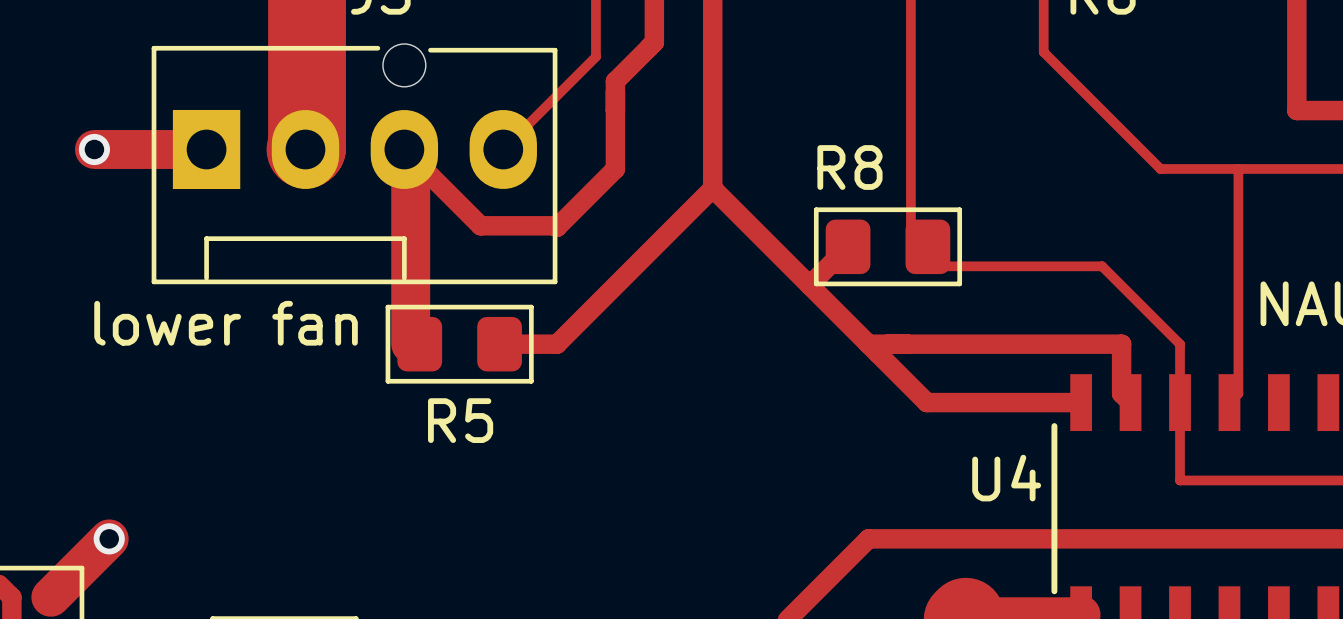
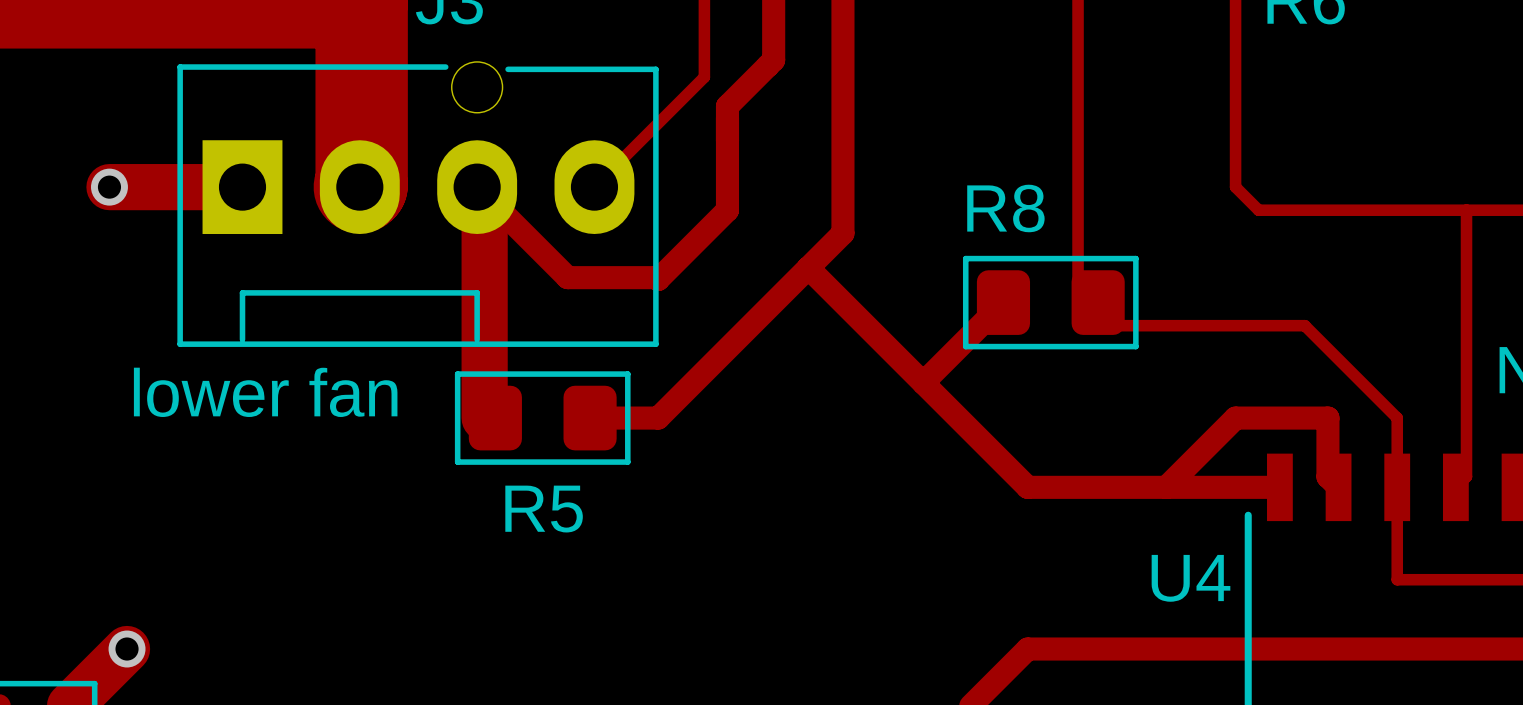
top track: (1043, 52) (1160, 168) -> (1235, 71) (1235, 187) (1258, 210) (1374, 210)
top track: (712, 188) (926, 402) -> (808, 267) (1027, 487) (1097, 487)
top track: none -> (957, 348) (923, 383)
top track: (868, 344) (1043, 344) -> (1166, 487) (1235, 418)

